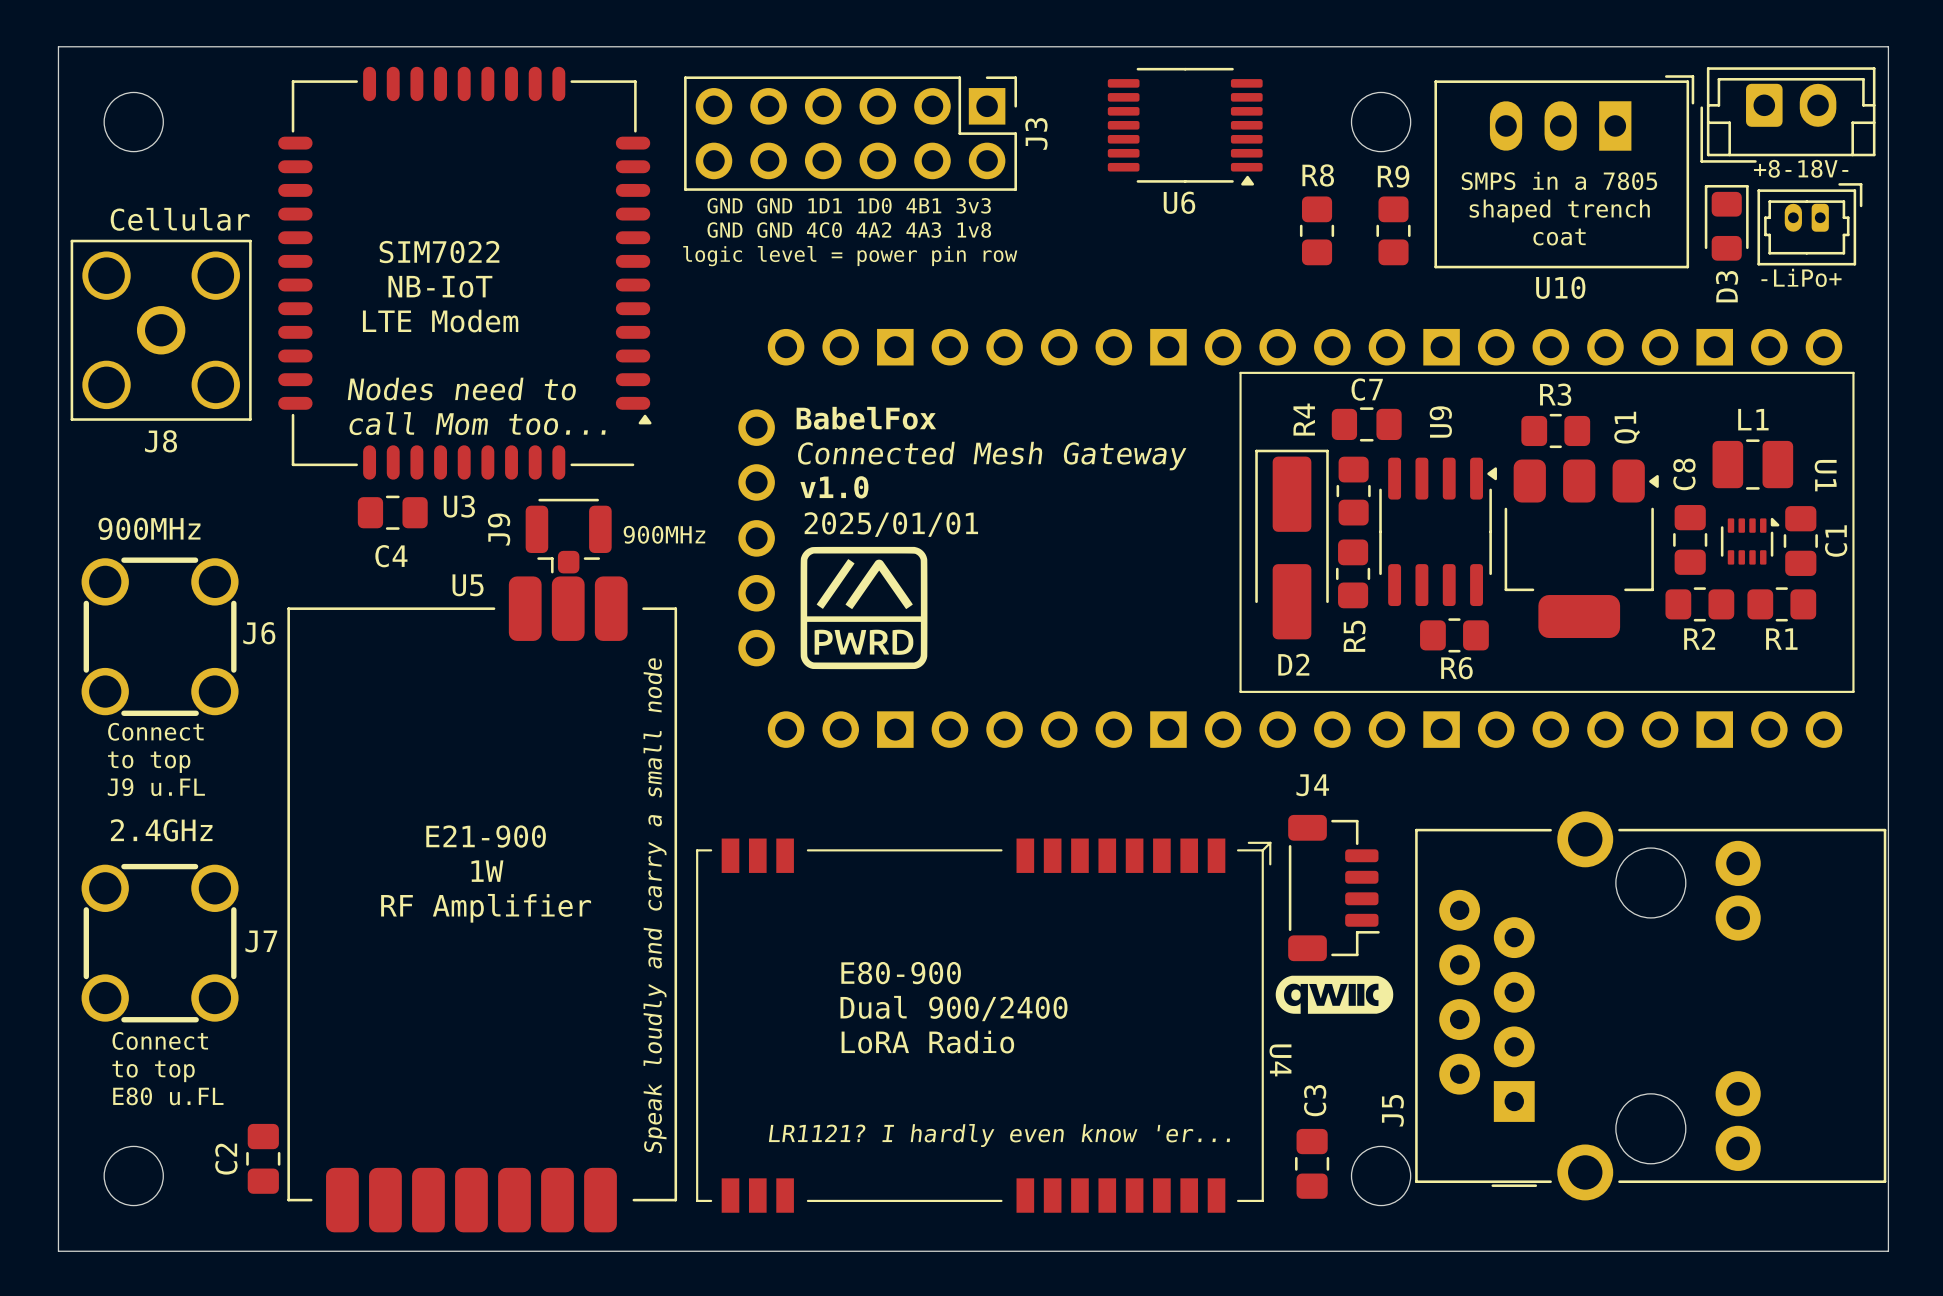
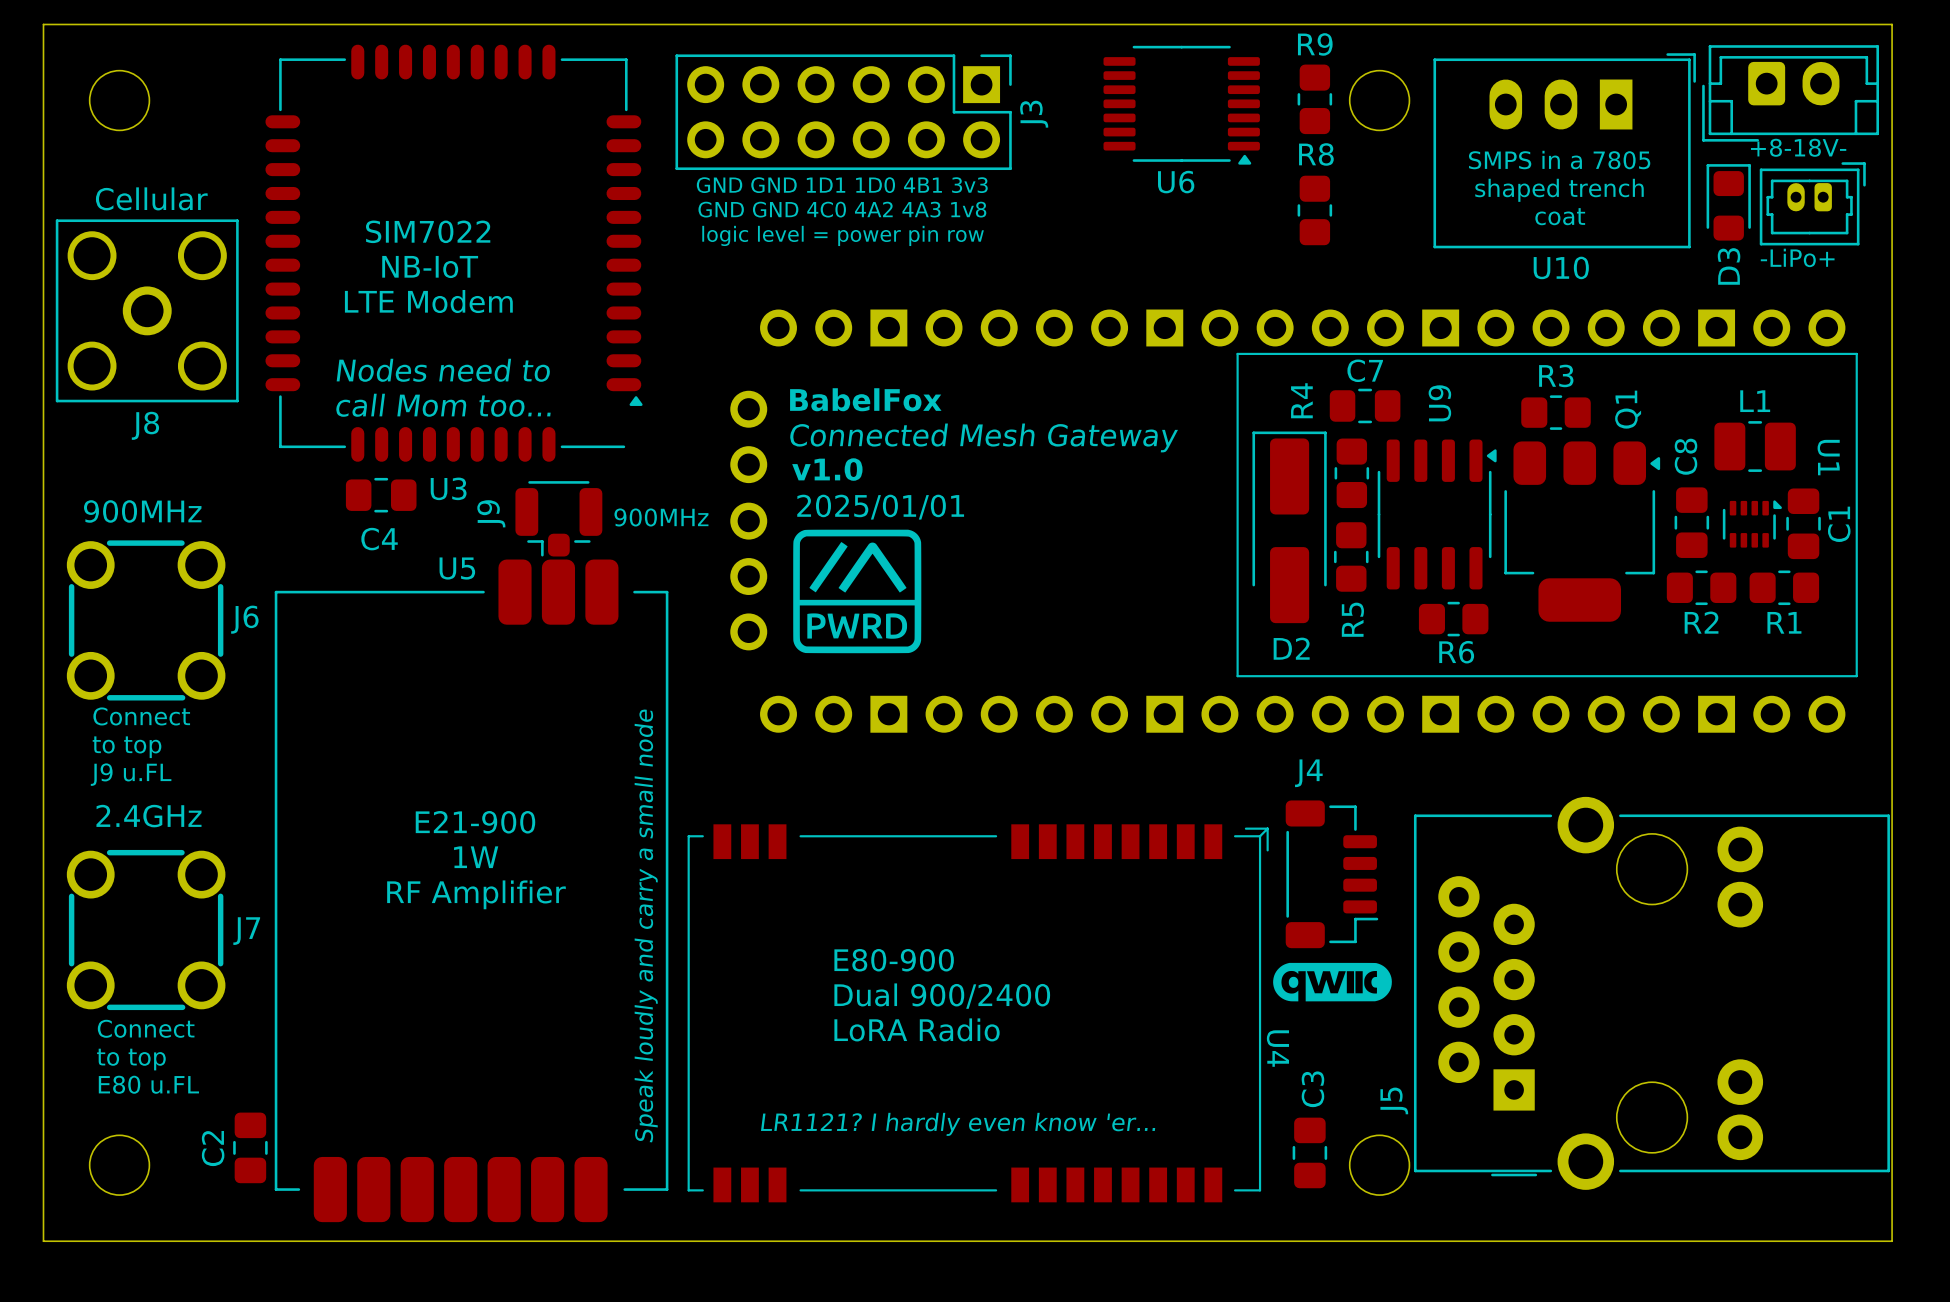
R9 position: (1393, 230) -> (1314, 99)

